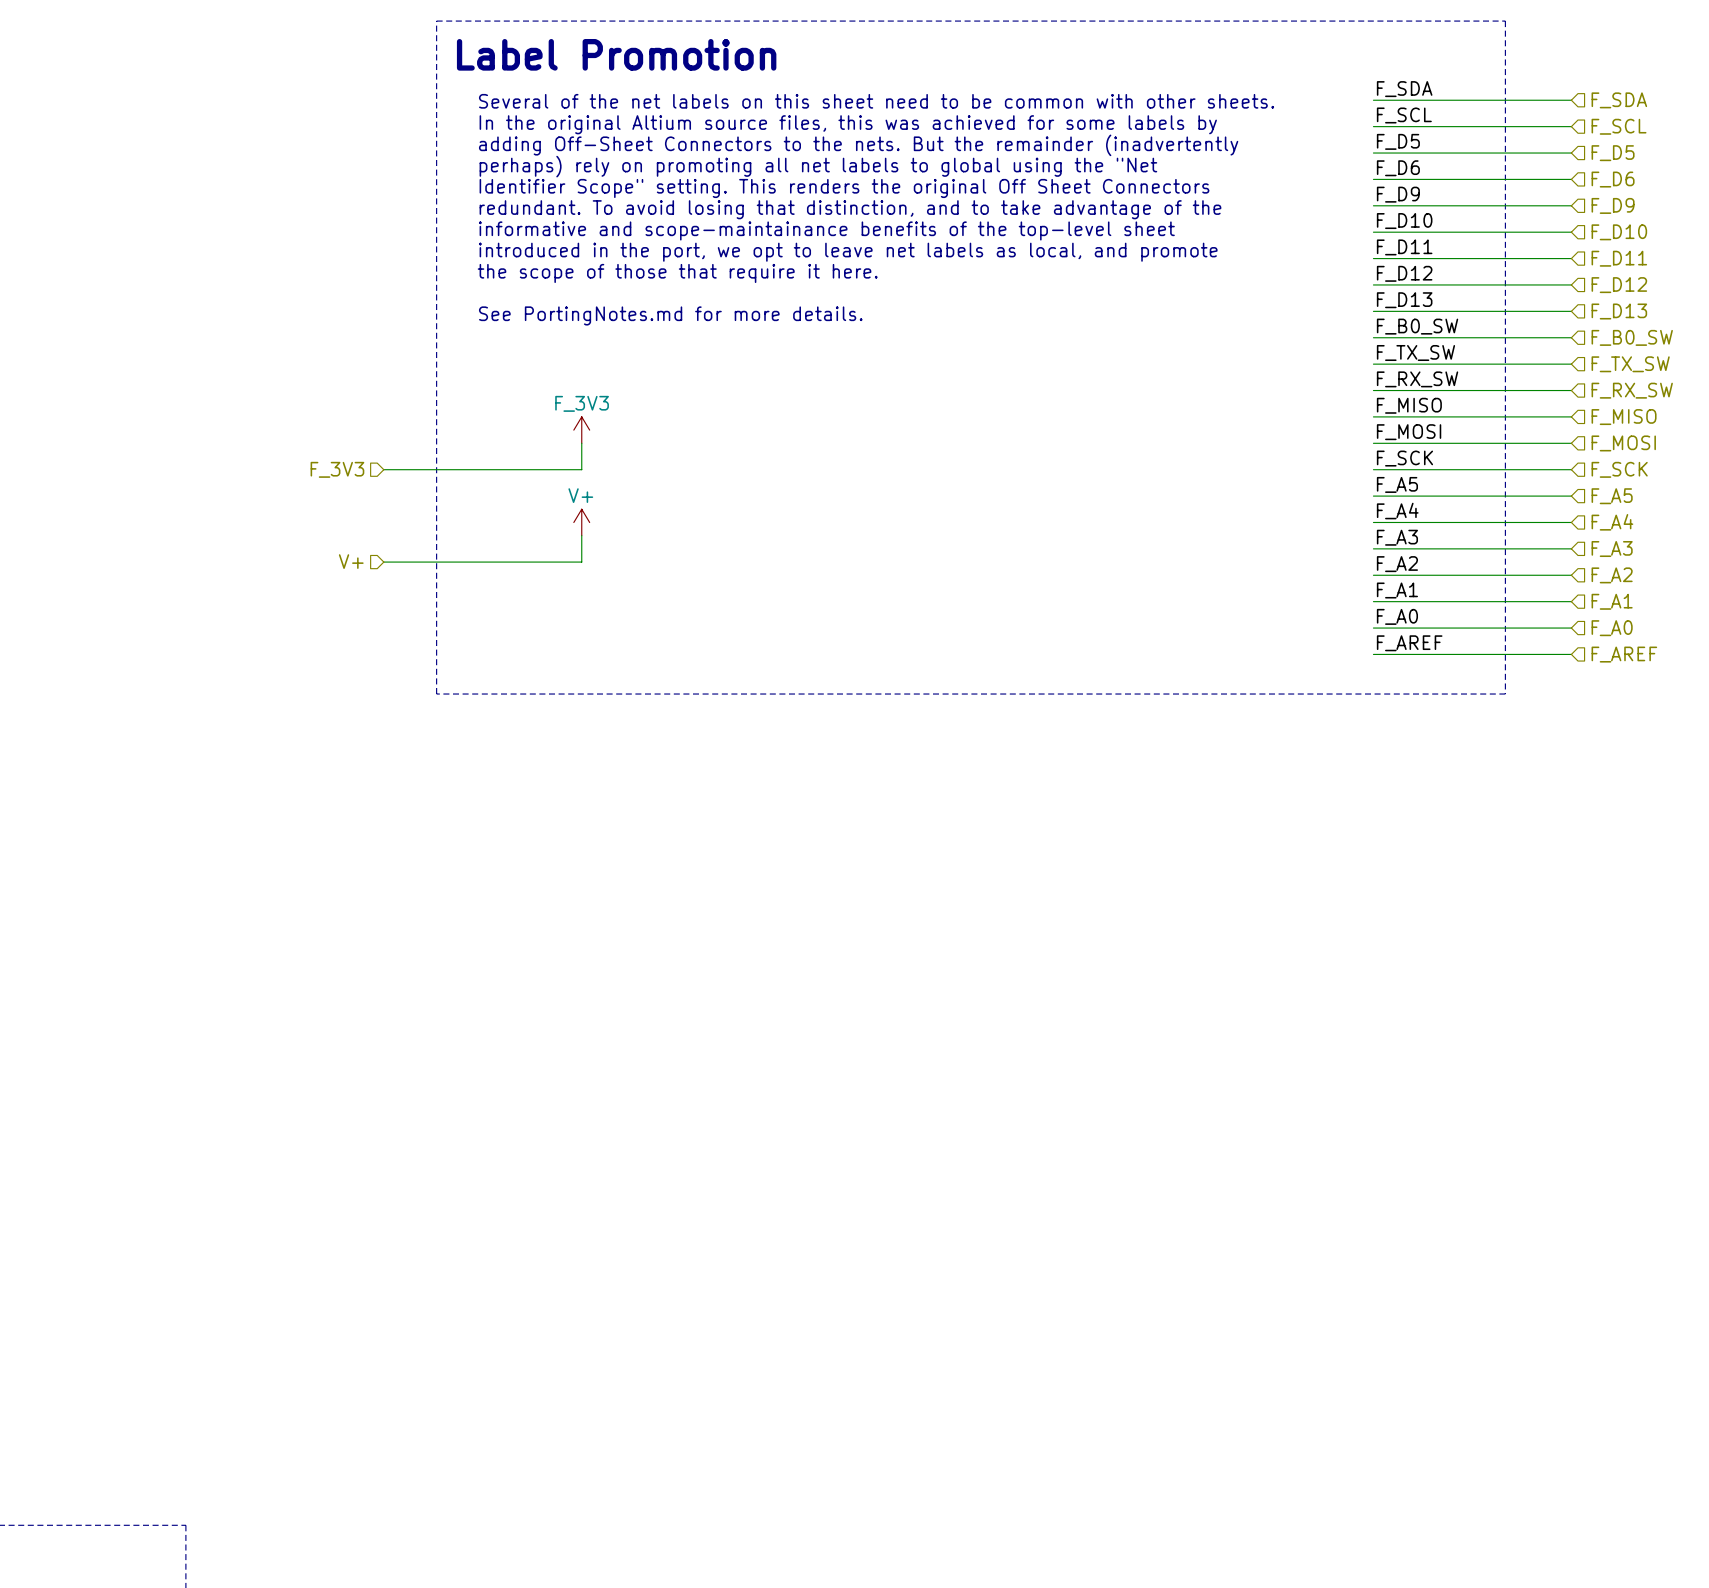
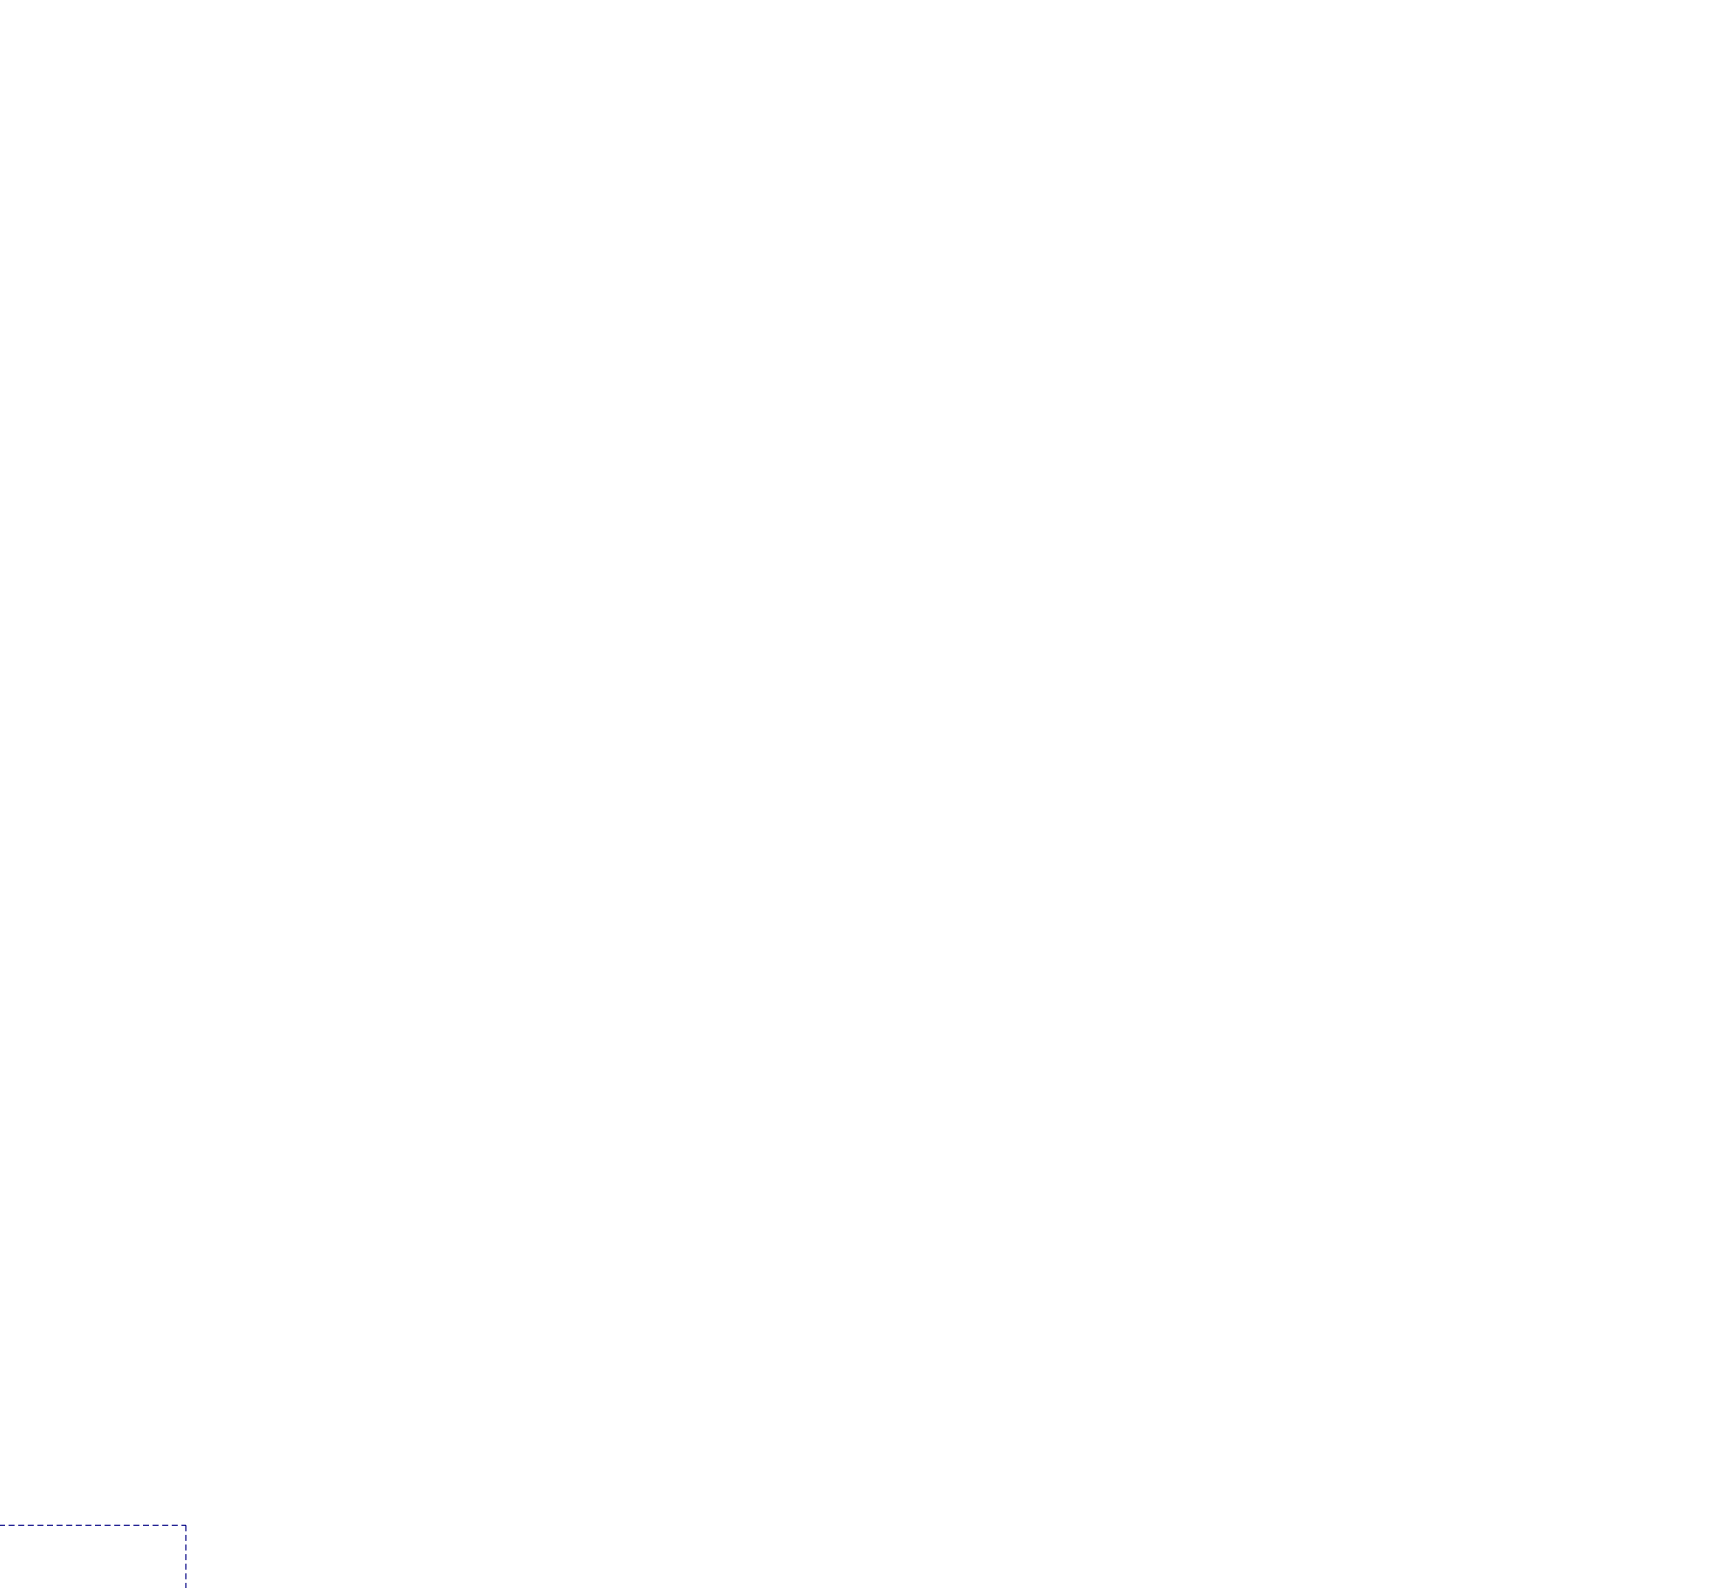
line: (436, 21) (1505, 21) (1505, 694) (436, 694) (436, 21) -> none
text: Label Promotion (616, 54) -> none
label: F_SDA (1404, 89) -> none
wire: (1373, 100) (1571, 100) -> none
hierarchical label: F_SDA (1619, 100) -> none
text: Several of the net labels on this sheet need to be common with other sheets. (876, 101) -> none
label: F_SCL (1404, 115) -> none
text: In the original Altium source files, this was achieved for some labels by (848, 124) -> none
wire: (1373, 126) (1571, 126) -> none
hierarchical label: F_SCL (1619, 126) -> none
label: F_D5 (1398, 141) -> none
text: adding Off-Sheet Connectors to the nets. But the remainder (inadvertently (858, 145) -> none
wire: (1373, 153) (1571, 153) -> none
hierarchical label: F_D5 (1613, 153) -> none
text: perhaps) rely on promoting all net labels to global using the "Net (818, 166) -> none
label: F_D6 (1398, 168) -> none
wire: (1373, 179) (1571, 179) -> none
hierarchical label: F_D6 (1613, 179) -> none
text: Identifier Scope" setting. This renders the original Off Sheet Connectors (844, 188) -> none
label: F_D9 (1398, 194) -> none
wire: (1373, 205) (1571, 205) -> none
hierarchical label: F_D9 (1613, 205) -> none
text: redundant. To avoid losing that distinction, and to take advantage of the (850, 209) -> none
label: F_D10 (1404, 221) -> none
text: informative and scope-maintainance benefits of the top-level sheet (826, 230) -> none
wire: (1373, 232) (1571, 232) -> none
hierarchical label: F_D10 (1619, 232) -> none
label: F_D11 (1404, 247) -> none
text: introduced in the port, we opt to leave net labels as local, and promote (848, 252) -> none
wire: (1373, 258) (1571, 258) -> none
hierarchical label: F_D11 (1619, 258) -> none
text: the scope of those that require it here. (677, 273) -> none
label: F_D12 (1404, 273) -> none
wire: (1373, 284) (1571, 284) -> none
hierarchical label: F_D12 (1619, 285) -> none
label: F_D13 (1404, 300) -> none
wire: (1373, 311) (1571, 311) -> none
hierarchical label: F_D13 (1619, 311) -> none
text: See PortingNotes.md for more details. (670, 315) -> none
label: F_B0_SW (1417, 326) -> none
wire: (1373, 337) (1571, 337) -> none
hierarchical label: F_B0_SW (1632, 337) -> none
label: F_TX_SW (1415, 352) -> none
wire: (1373, 364) (1571, 364) -> none
hierarchical label: F_TX_SW (1630, 364) -> none
label: F_RX_SW (1417, 379) -> none
wire: (1373, 390) (1571, 390) -> none
hierarchical label: F_RX_SW (1632, 390) -> none
label: F_MISO (1409, 405) -> none
wire: (1373, 416) (1571, 416) -> none
hierarchical label: F_MISO (1624, 417) -> none
power symbol: F_3V3 (581, 430) -> none
label: F_MOSI (1409, 432) -> none
wire: (581, 443) (581, 469) (383, 469) -> none
wire: (1373, 443) (1571, 443) -> none
hierarchical label: F_MOSI (1623, 443) -> none
label: F_SCK (1404, 458) -> none
hierarchical label: F_3V3 (337, 469) -> none
wire: (1373, 469) (1571, 469) -> none
hierarchical label: F_SCK (1619, 469) -> none
label: F_A5 (1397, 484) -> none
wire: (1373, 496) (1571, 496) -> none
hierarchical label: F_A5 (1612, 496) -> none
label: F_A4 (1397, 511) -> none
power symbol: V+ (581, 522) -> none
wire: (1373, 522) (1571, 522) -> none
hierarchical label: F_A4 (1612, 522) -> none
wire: (581, 535) (581, 562) (383, 562) -> none
label: F_A3 (1397, 537) -> none
wire: (1373, 548) (1571, 548) -> none
hierarchical label: F_A3 (1612, 549) -> none
hierarchical label: V+ (351, 561) -> none
label: F_A2 (1397, 564) -> none
wire: (1373, 575) (1571, 575) -> none
hierarchical label: F_A2 (1612, 575) -> none
label: F_A1 (1397, 590) -> none
wire: (1373, 601) (1571, 601) -> none
hierarchical label: F_A1 (1612, 601) -> none
label: F_A0 (1397, 616) -> none
wire: (1373, 628) (1571, 628) -> none
hierarchical label: F_A0 (1612, 628) -> none
label: F_AREF (1409, 643) -> none
wire: (1373, 654) (1571, 654) -> none
hierarchical label: F_AREF (1624, 654) -> none

